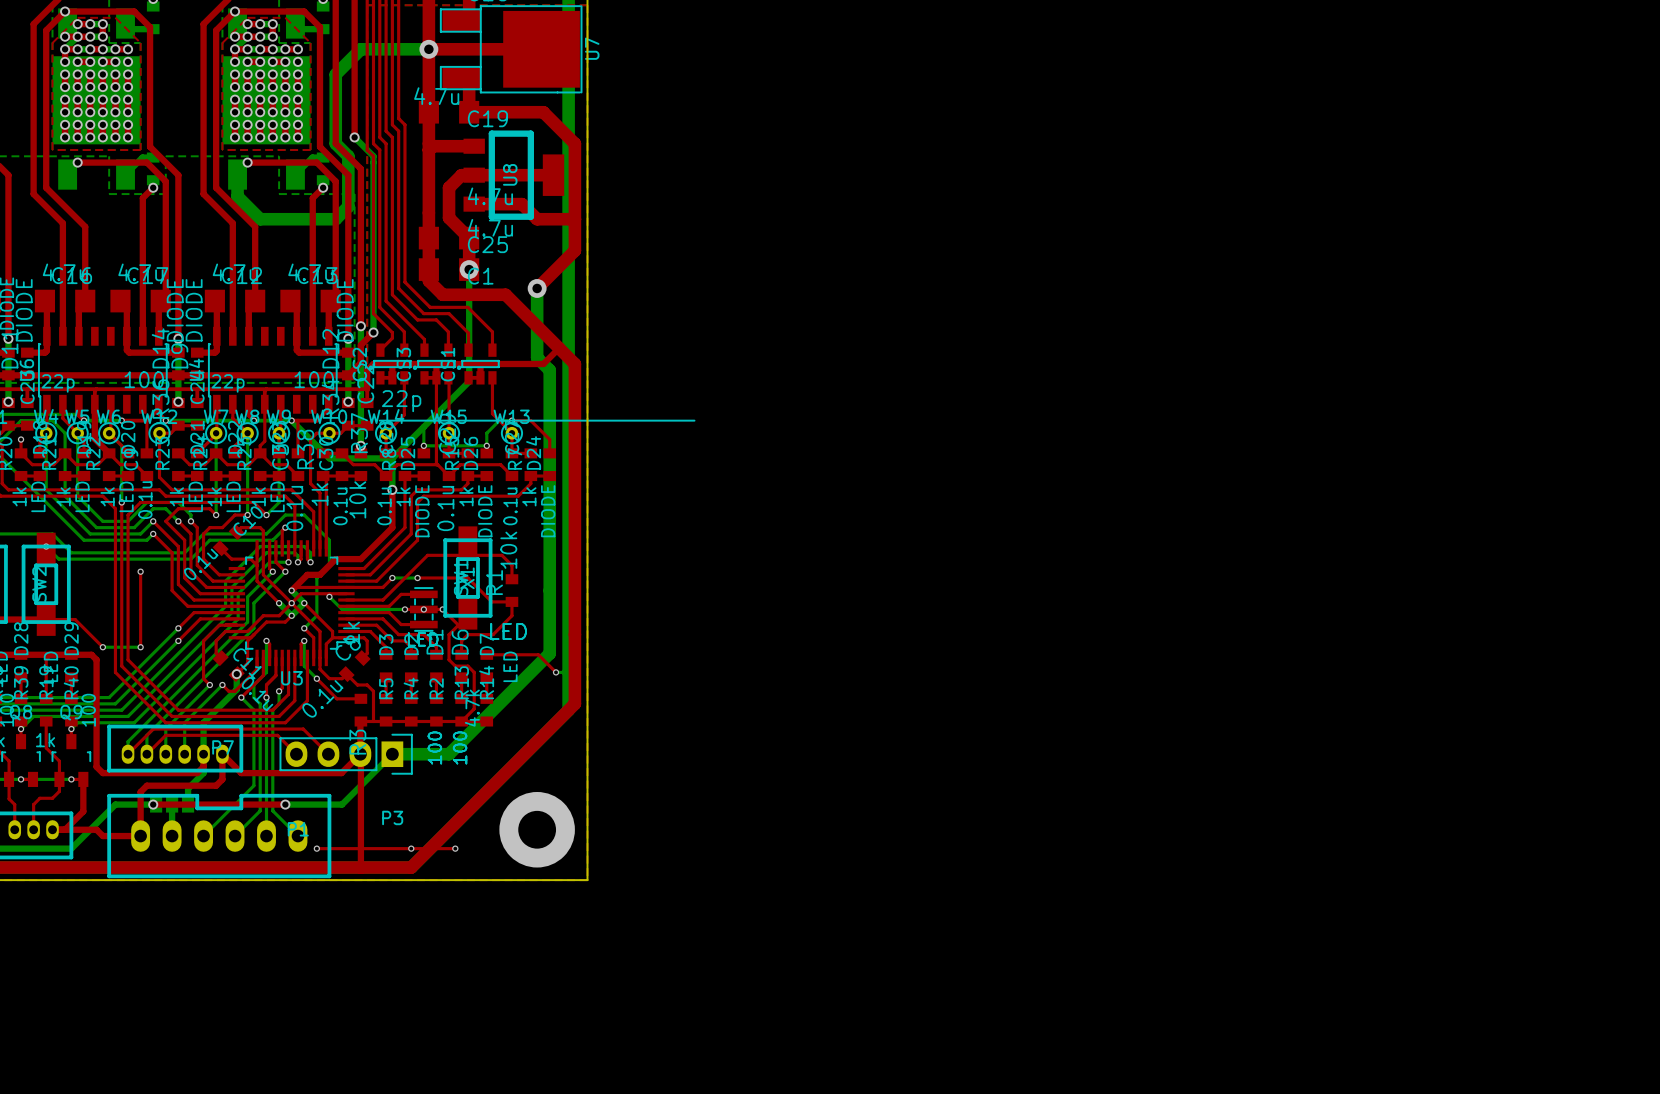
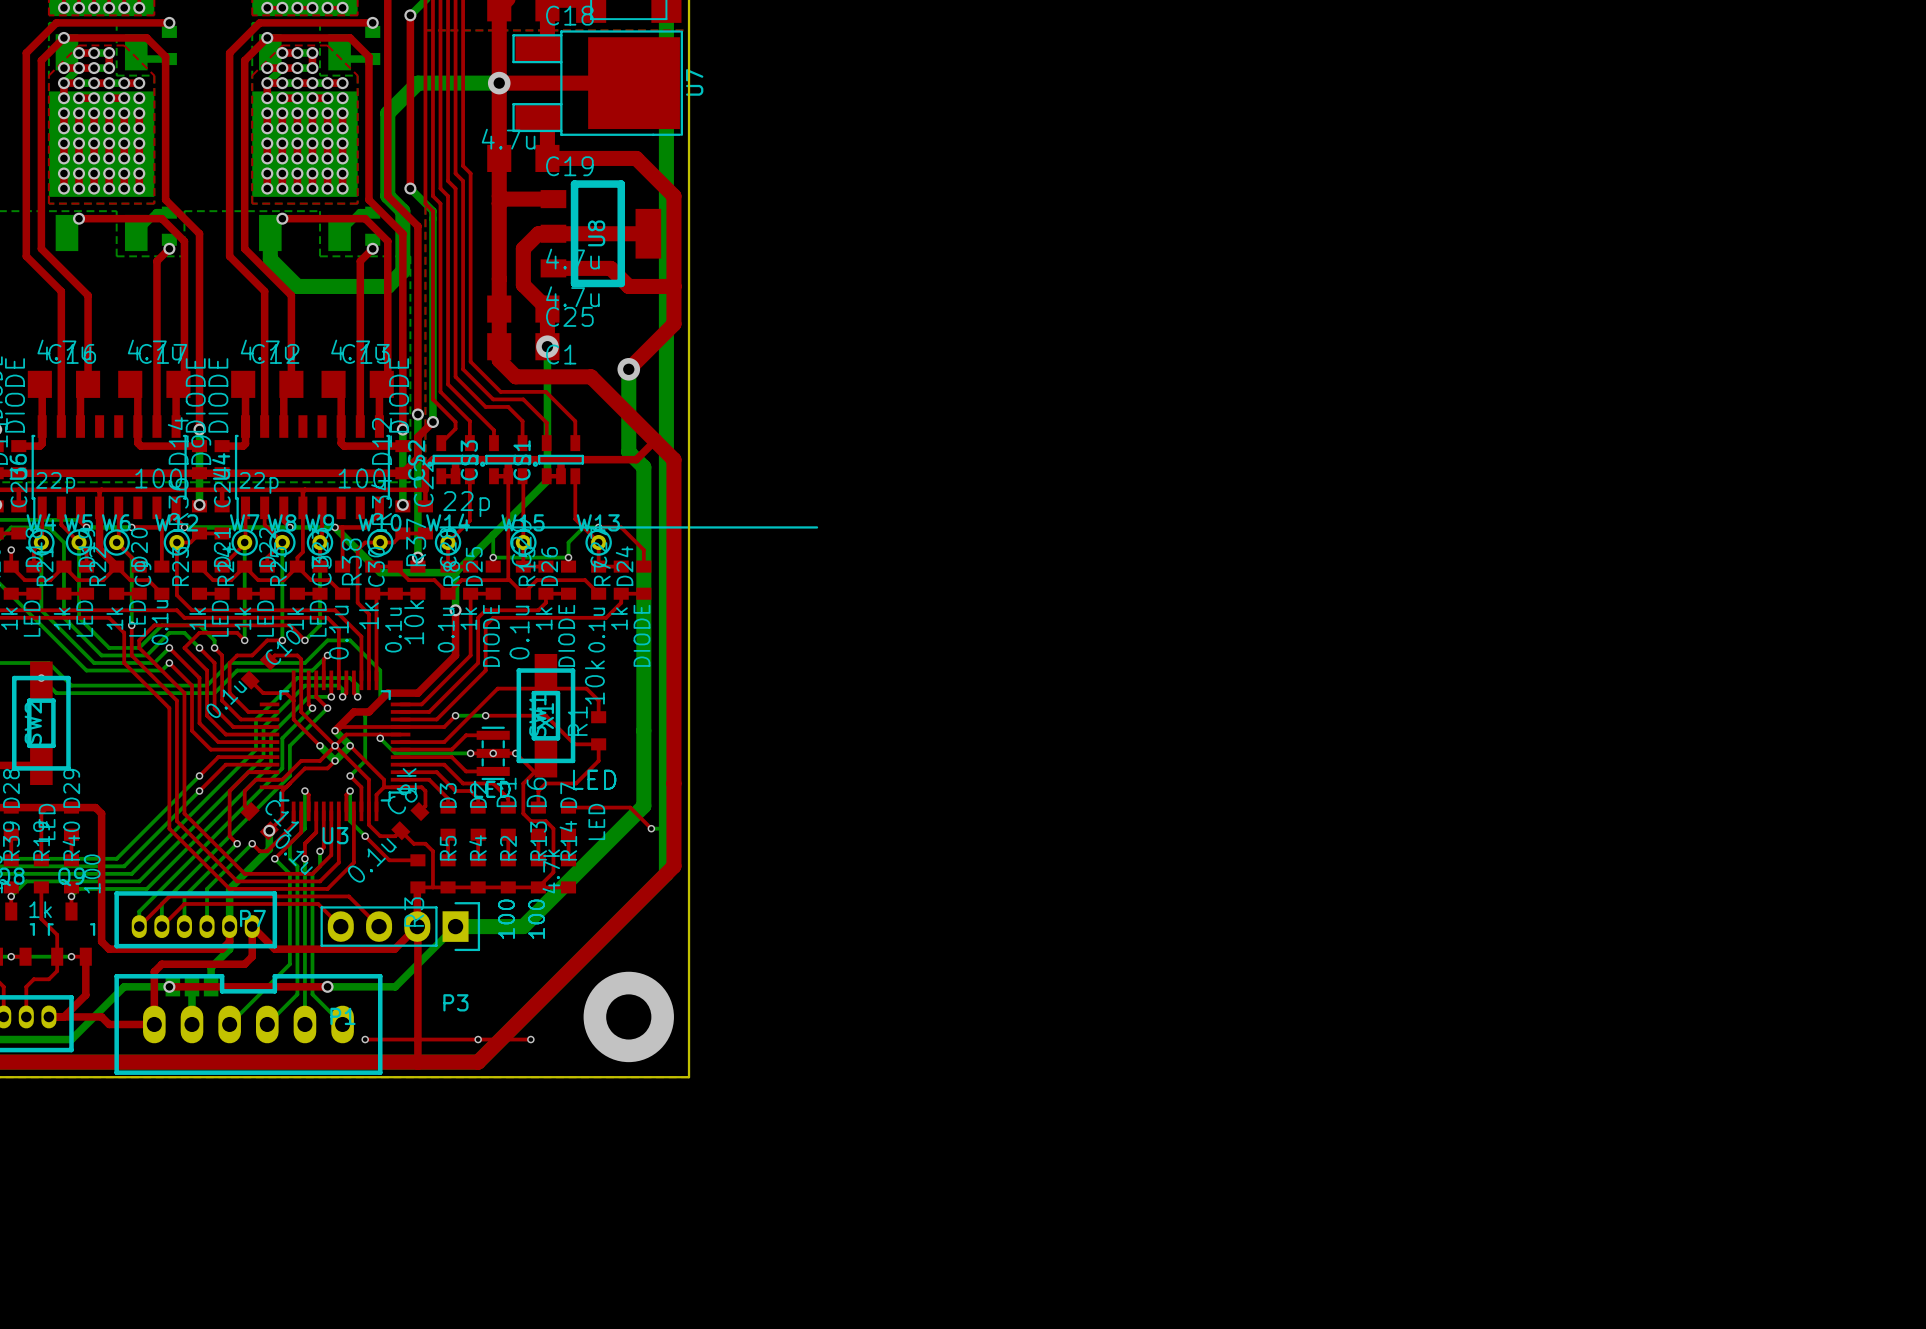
top track: (128, 521) (128, 659) (178, 710) (216, 710) -> (139, 647) (184, 693) (184, 813) (244, 873)
top track: (121, 527) (121, 666) (172, 716) (209, 716) -> (131, 655) (176, 700) (176, 821) (237, 881)
top track: (115, 533) (115, 672) (165, 722) (203, 722) -> (124, 663) (169, 708) (169, 828) (229, 888)
top track: (140, 571) (140, 647) -> none
via: (140, 571) -> none
top track: (46, 619) (75, 619) (102, 647) -> none
bottom track: (102, 647) (140, 647) -> none
via: (102, 647) -> none
via: (140, 647) -> none

